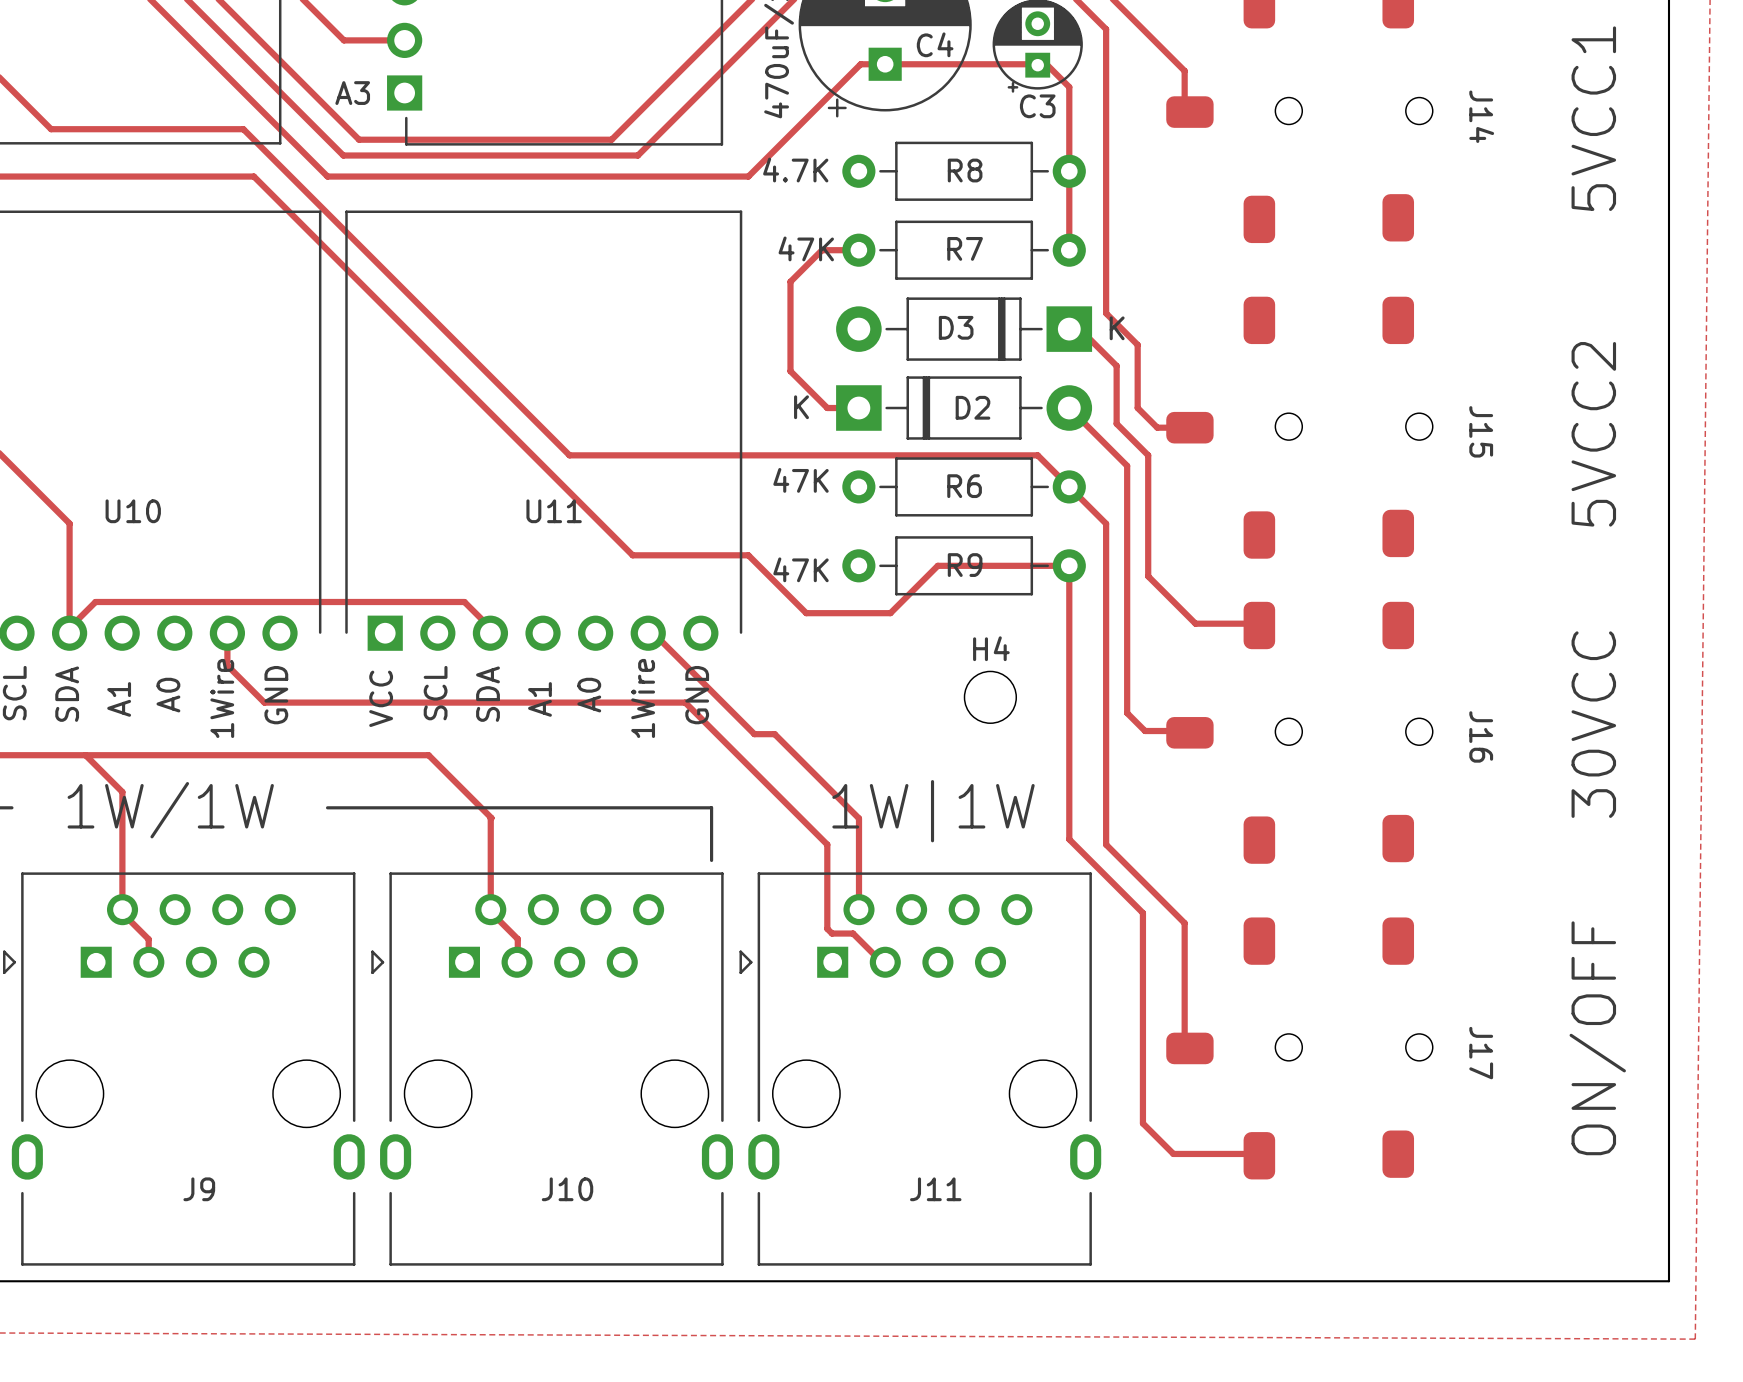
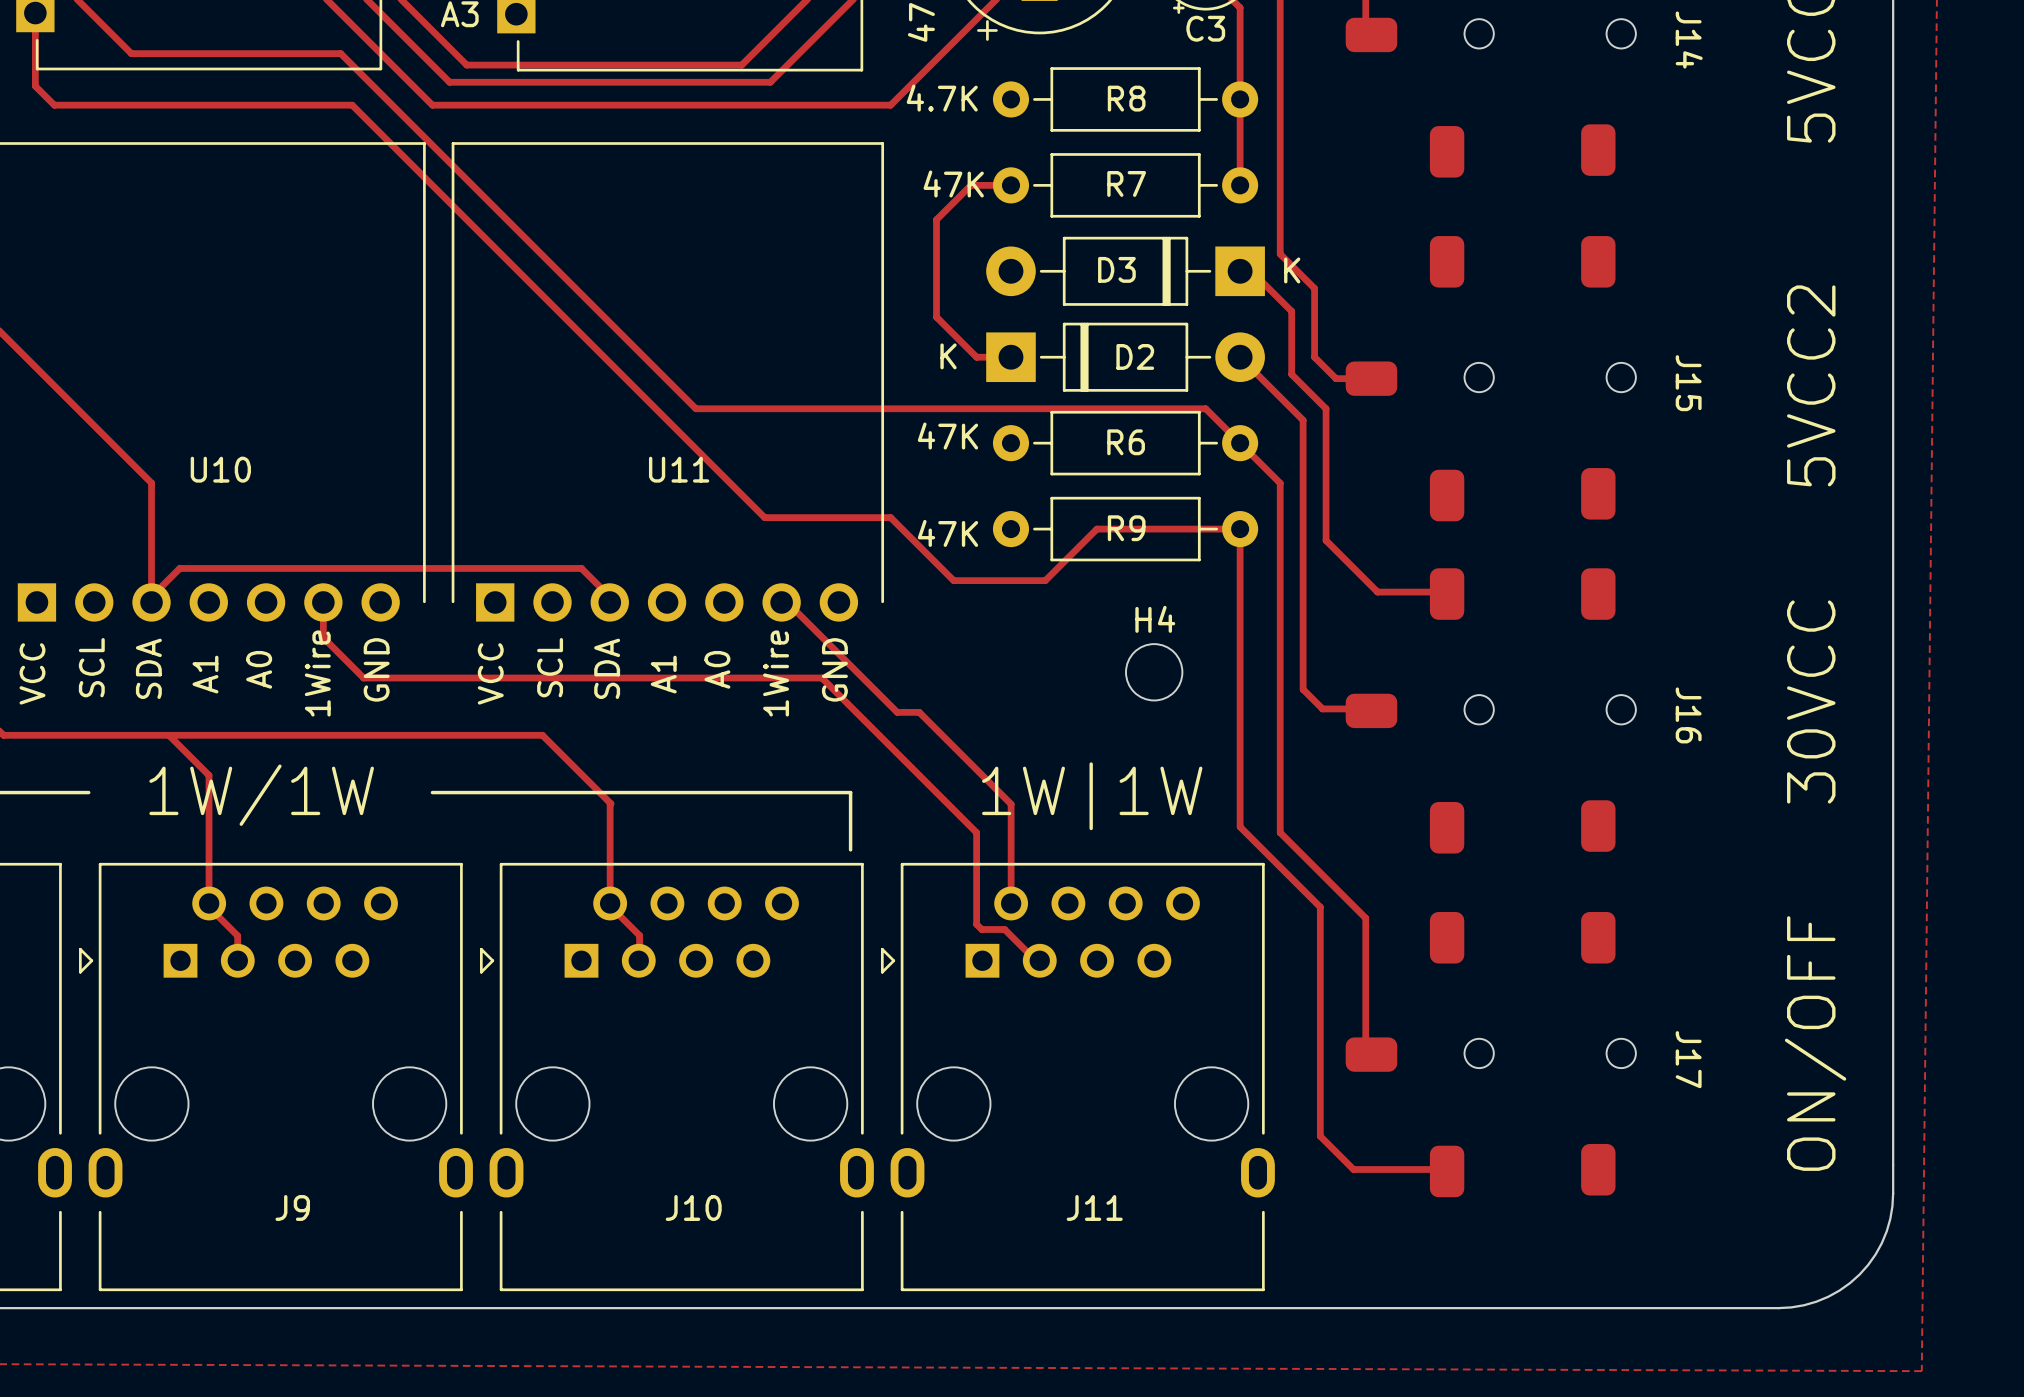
board edge: (1668, 1176) (1668, 1281) (1563, 1281) -> (1893, 1193) (1886, 1231) (1875, 1254) (1859, 1274) (1839, 1290) (1816, 1301) (1778, 1308)

